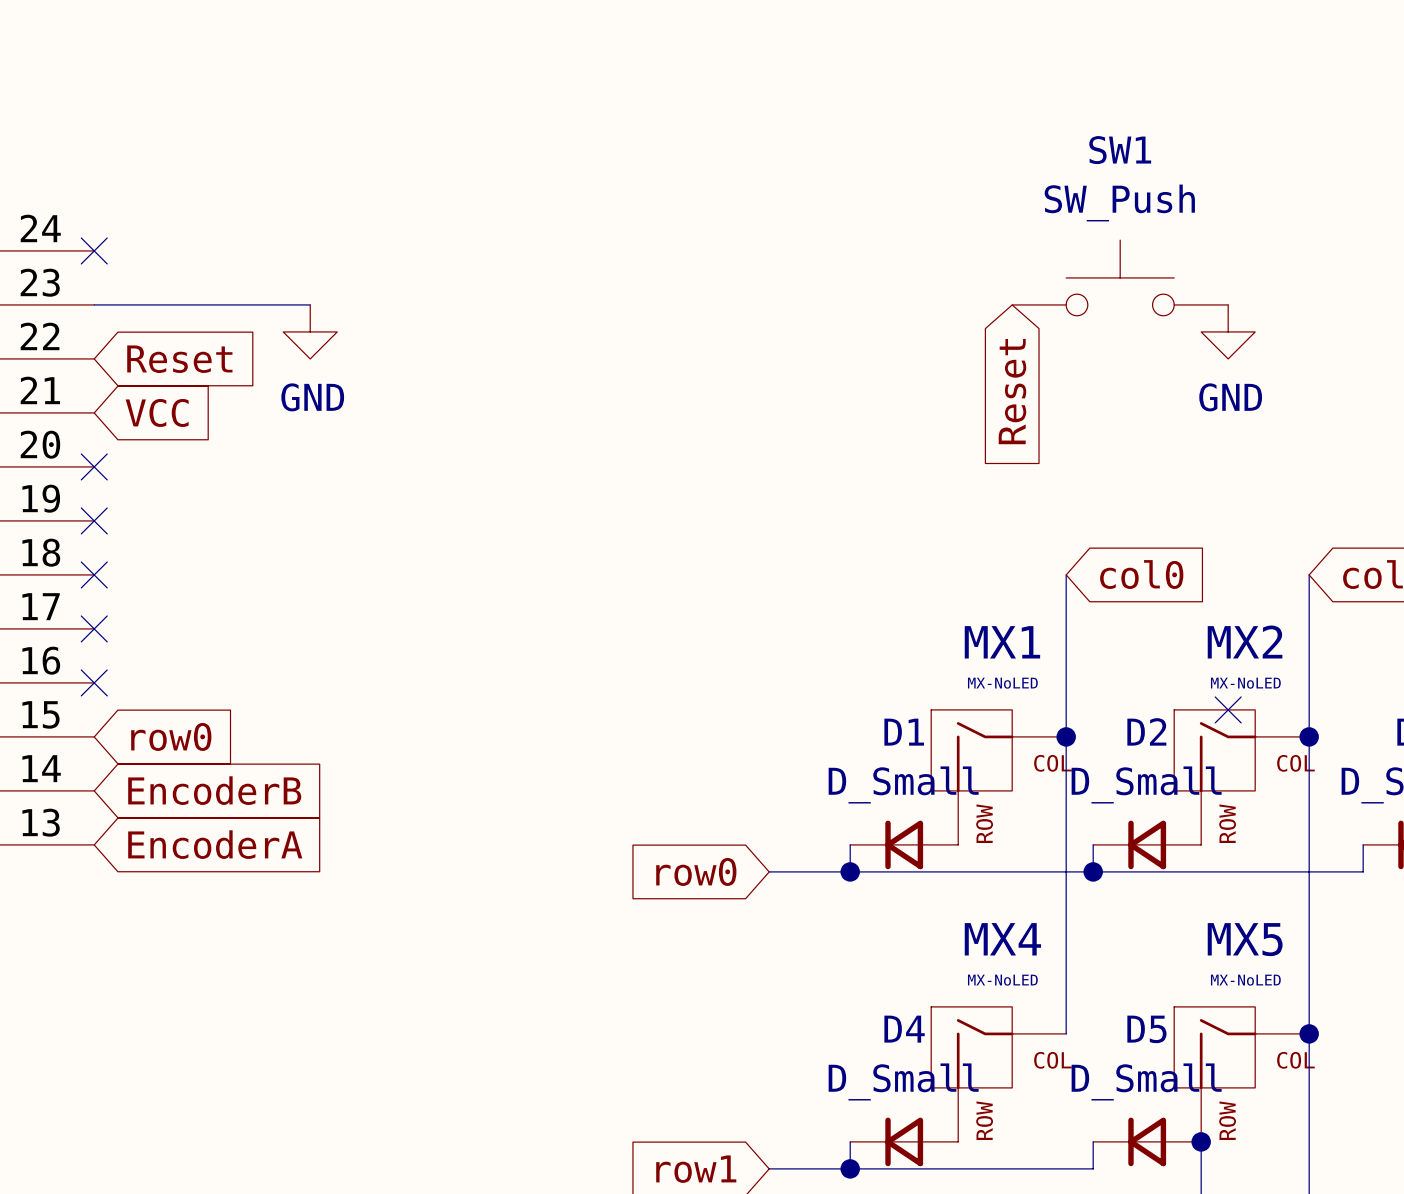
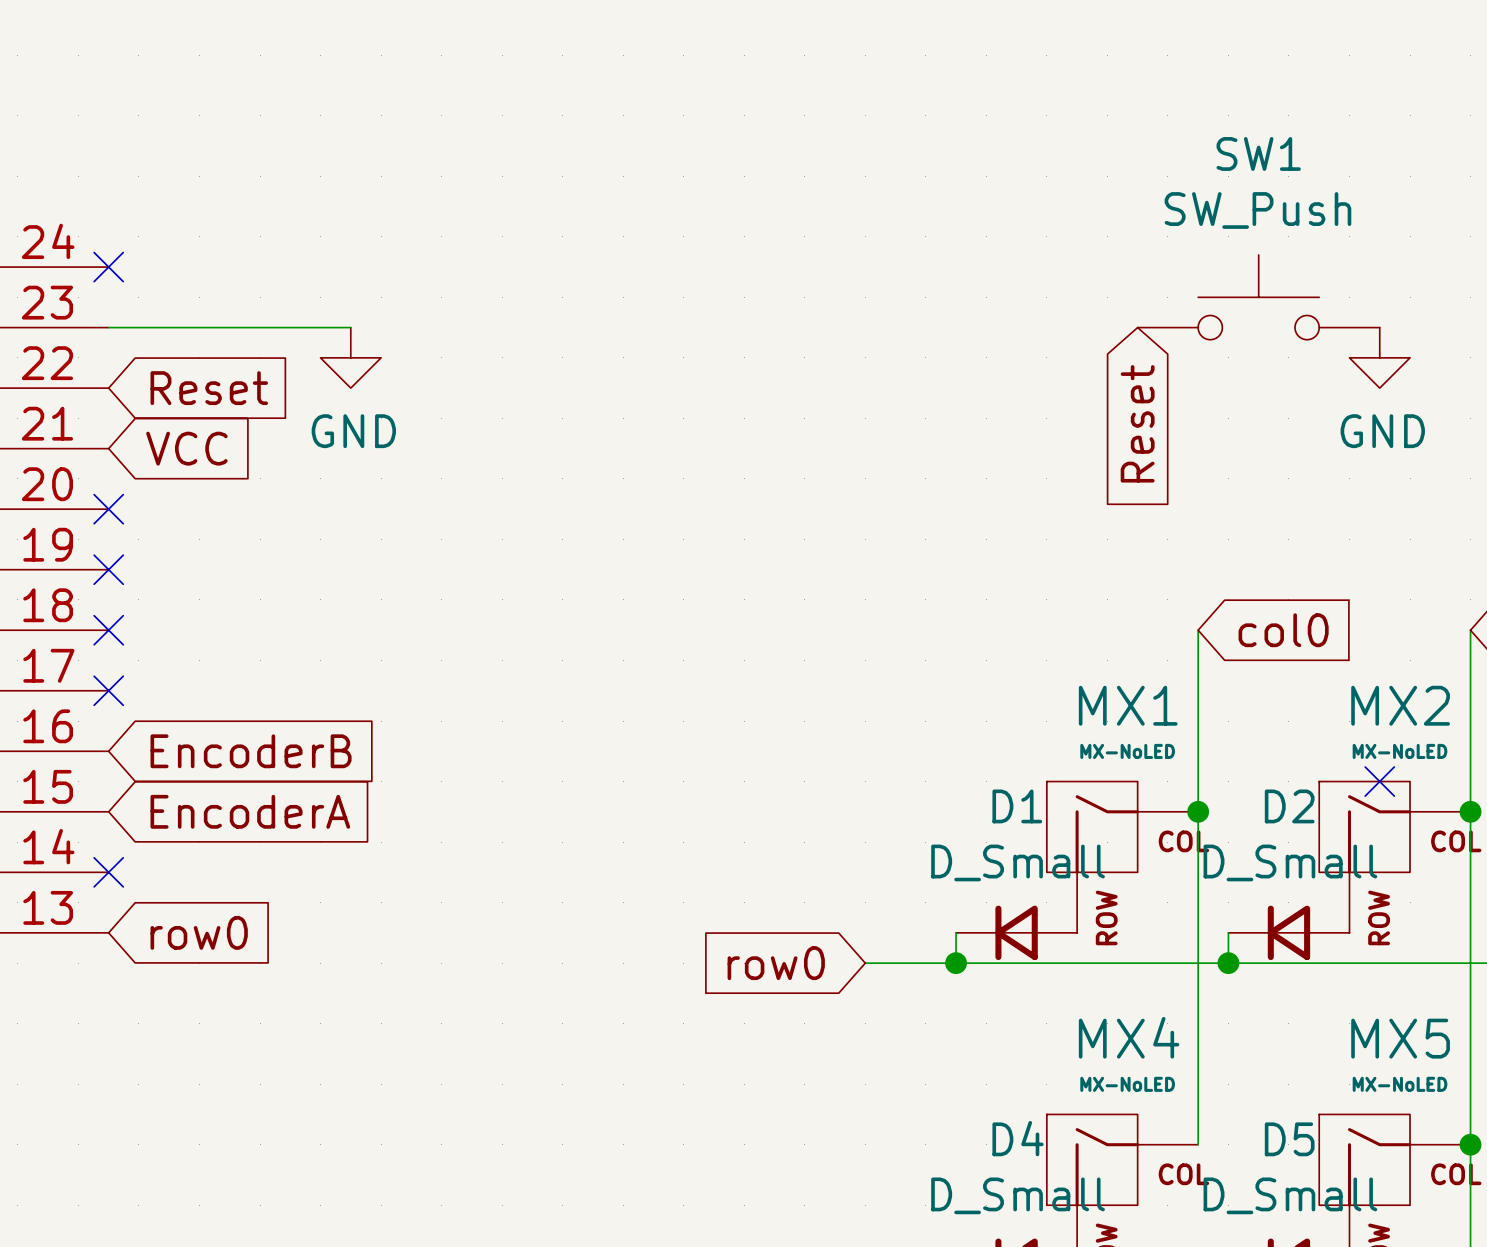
no-connect mark position: (94, 682) -> (108, 872)
global label: row0 (171, 736) -> EncoderA (250, 811)
global label position: EncoderB (214, 790) -> EncoderB (251, 751)
global label: EncoderA (215, 844) -> row0 (199, 932)

